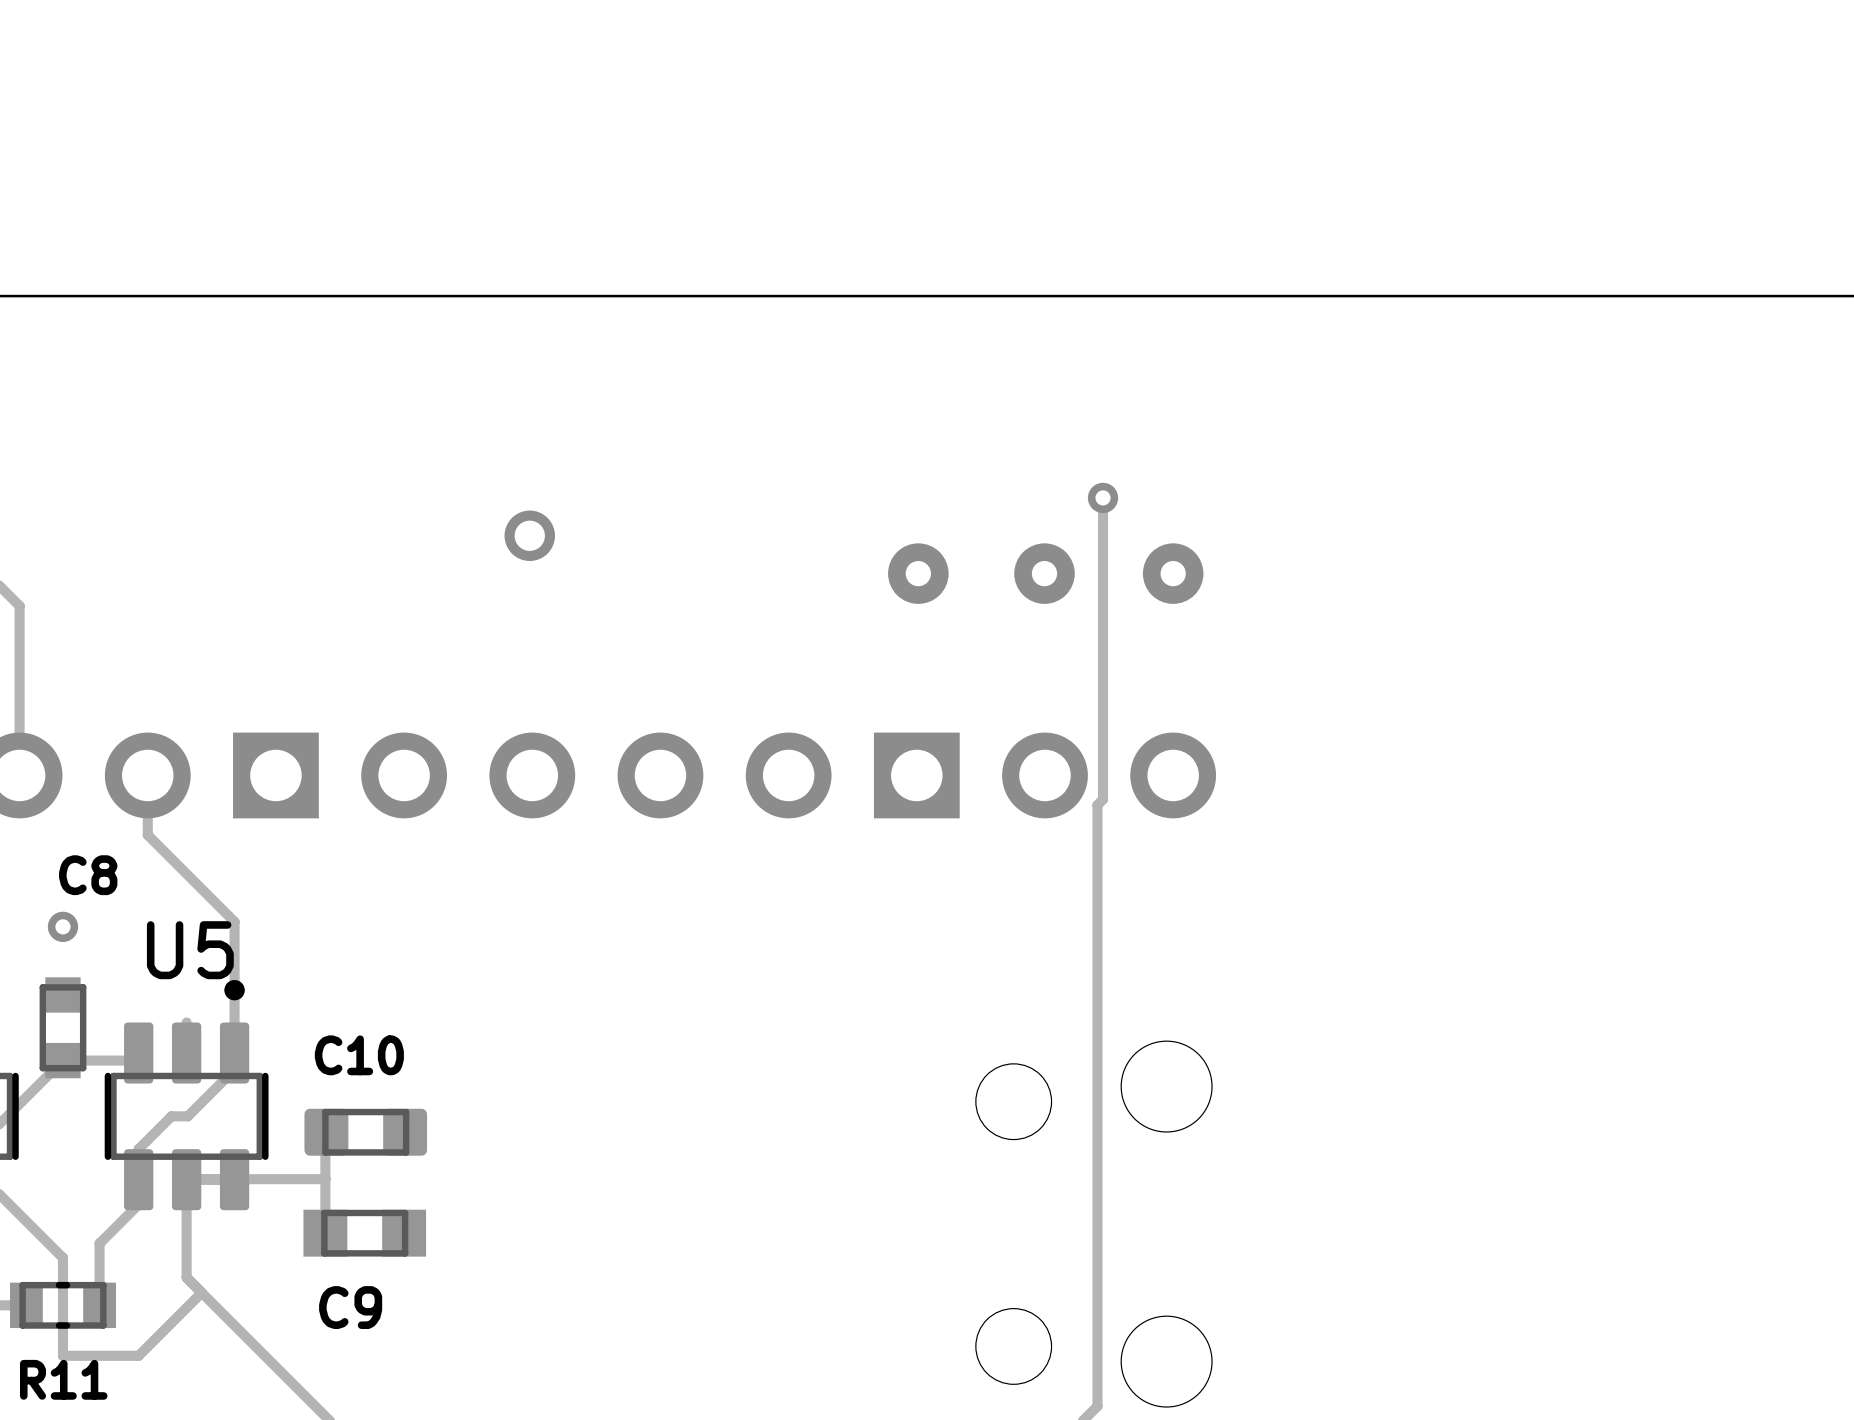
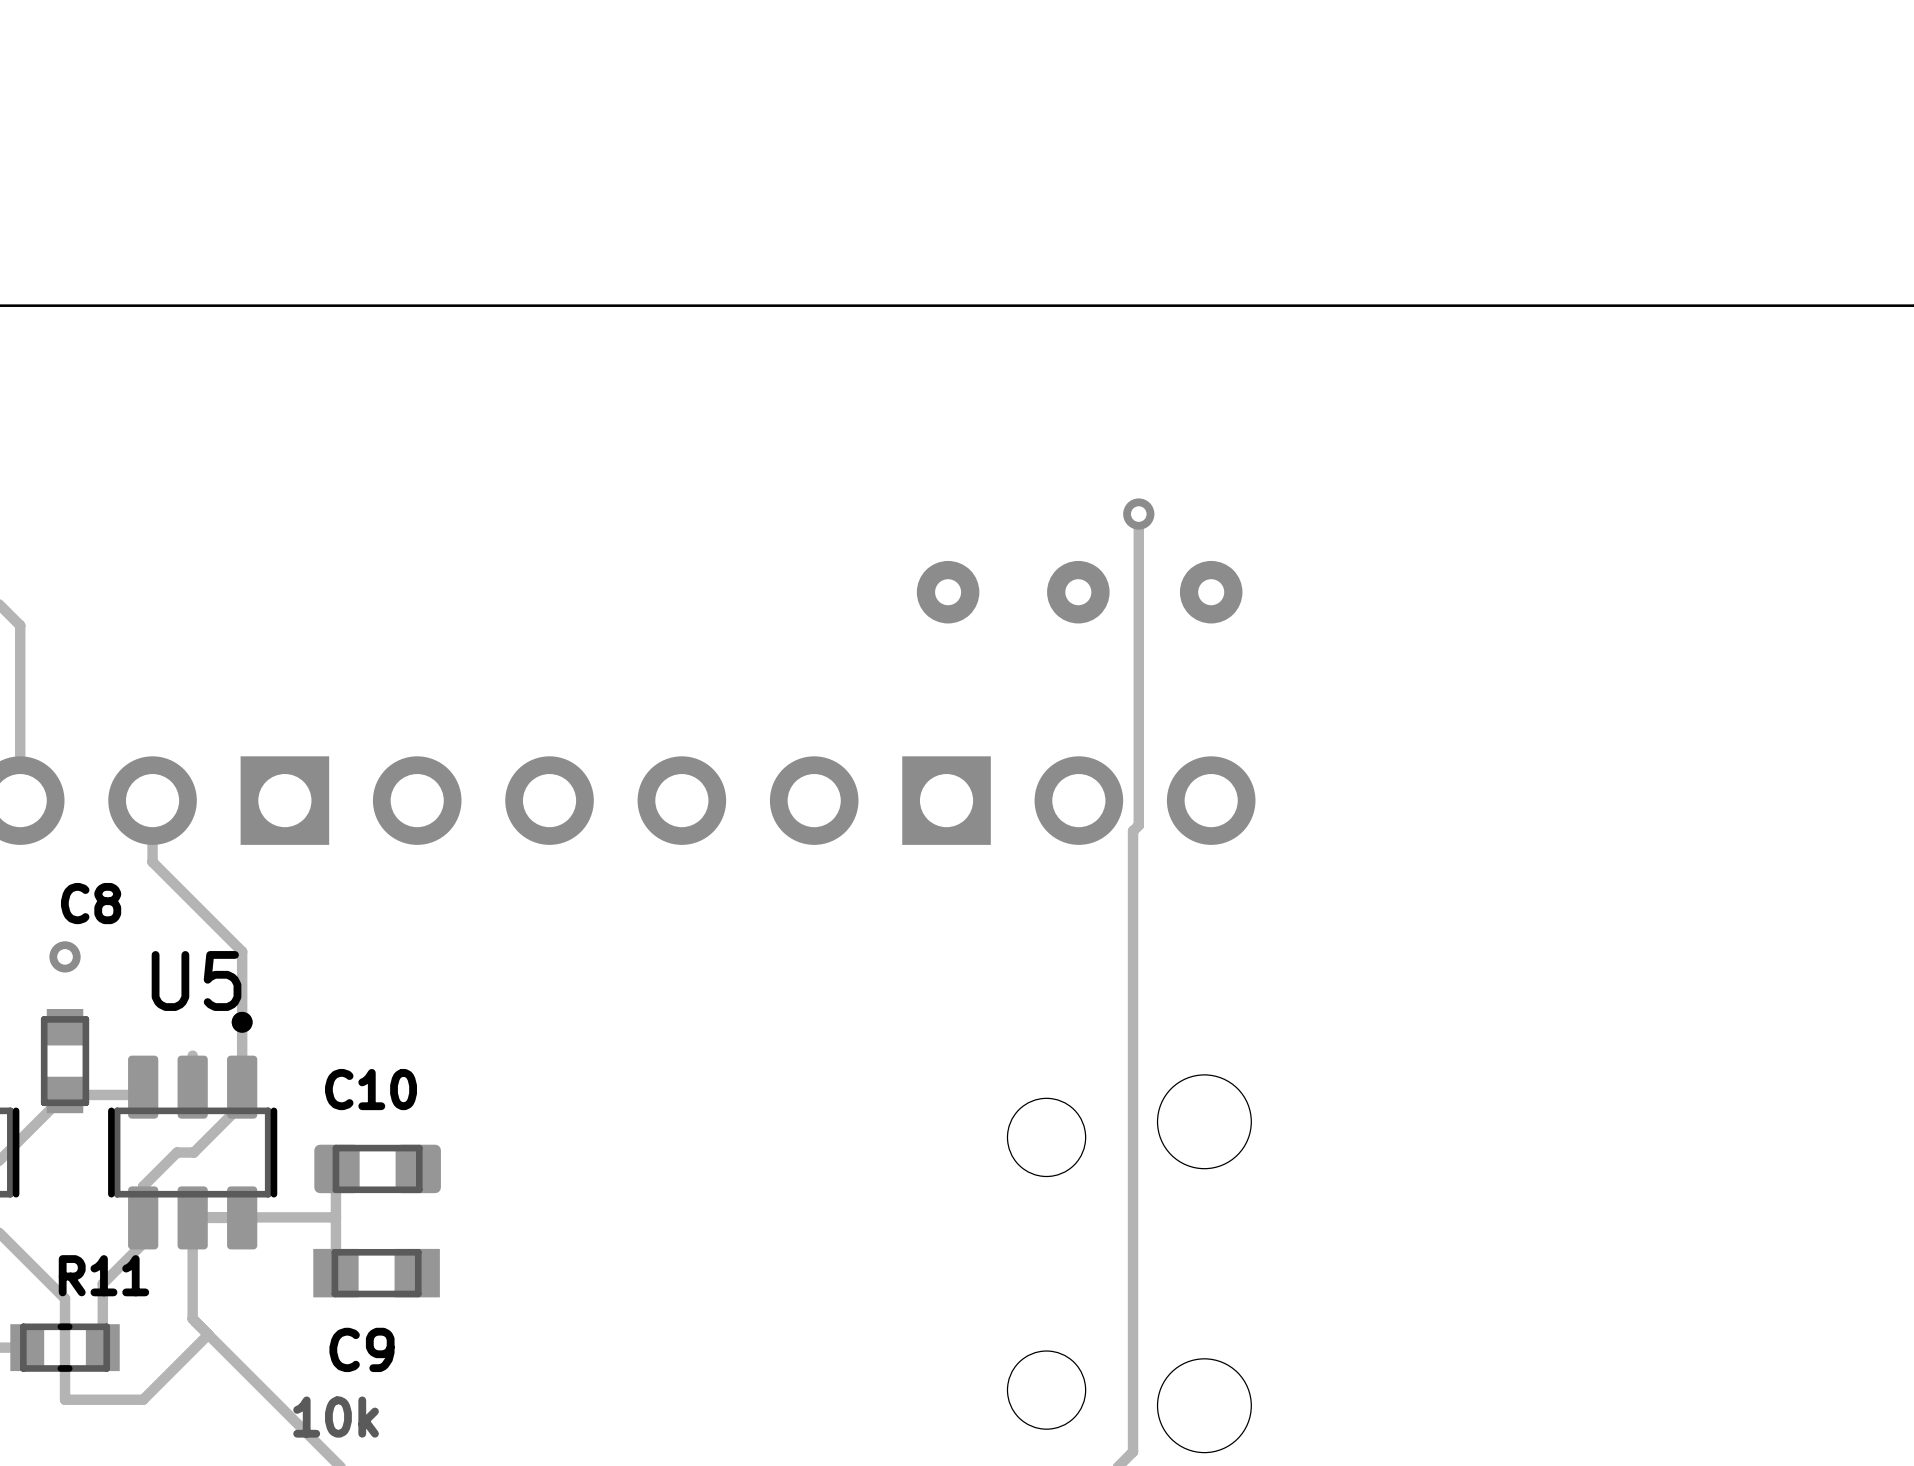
via: (529, 535) -> none
R11 value: none -> 10k (336, 1417)
R11 name position: R11 (63, 1379) -> R11 (103, 1275)

